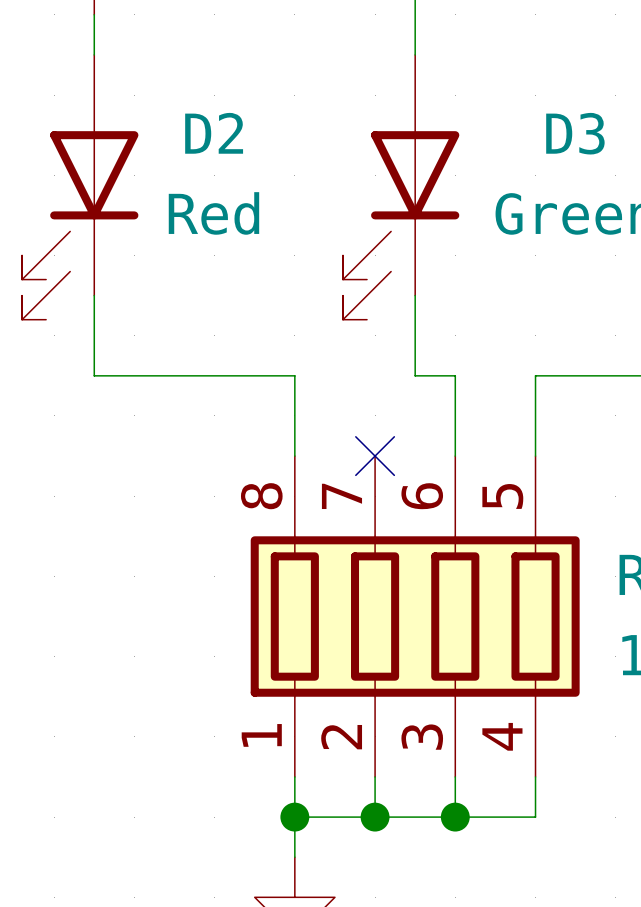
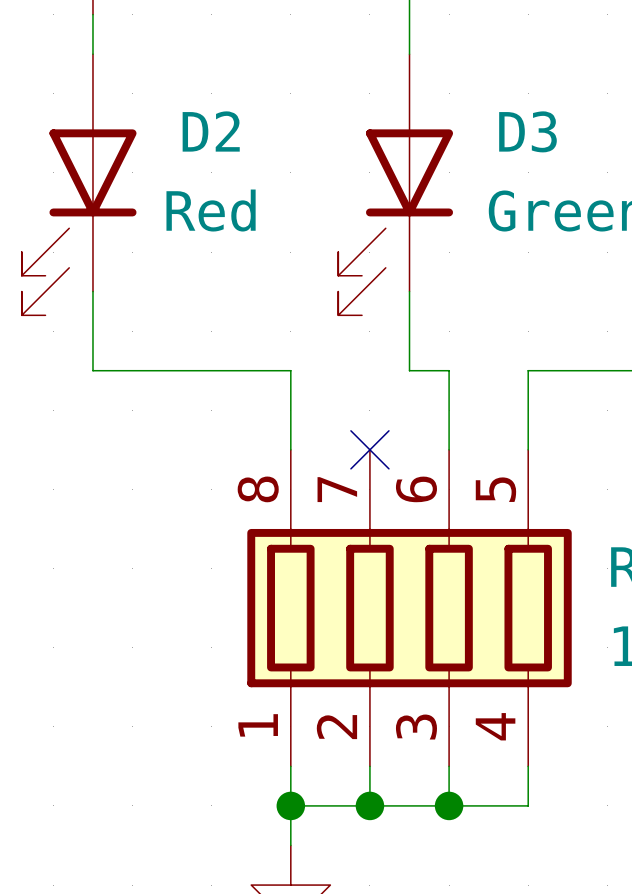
D3 name position: D3 (575, 133) -> D3 (527, 131)

